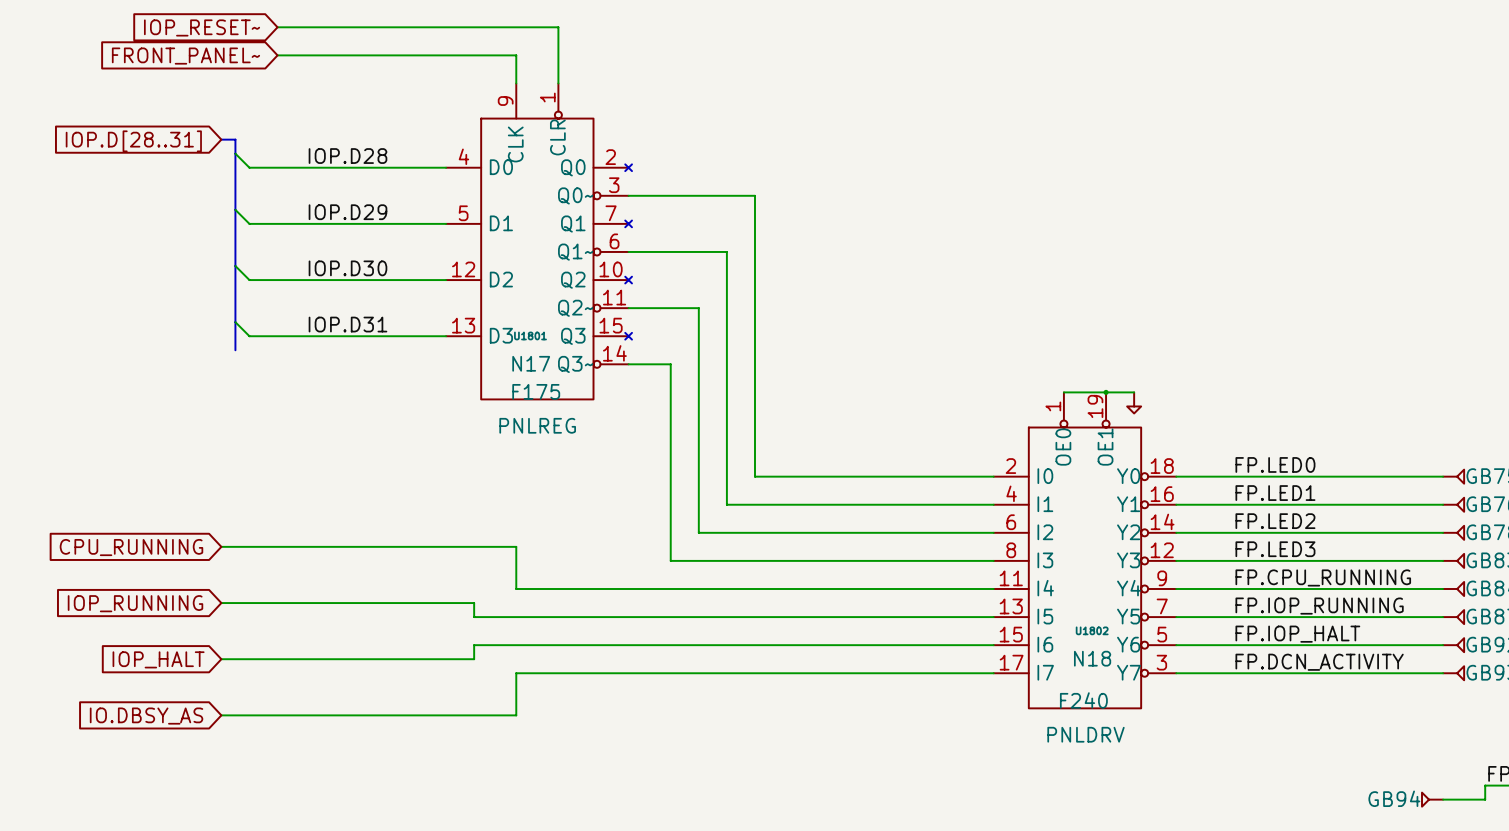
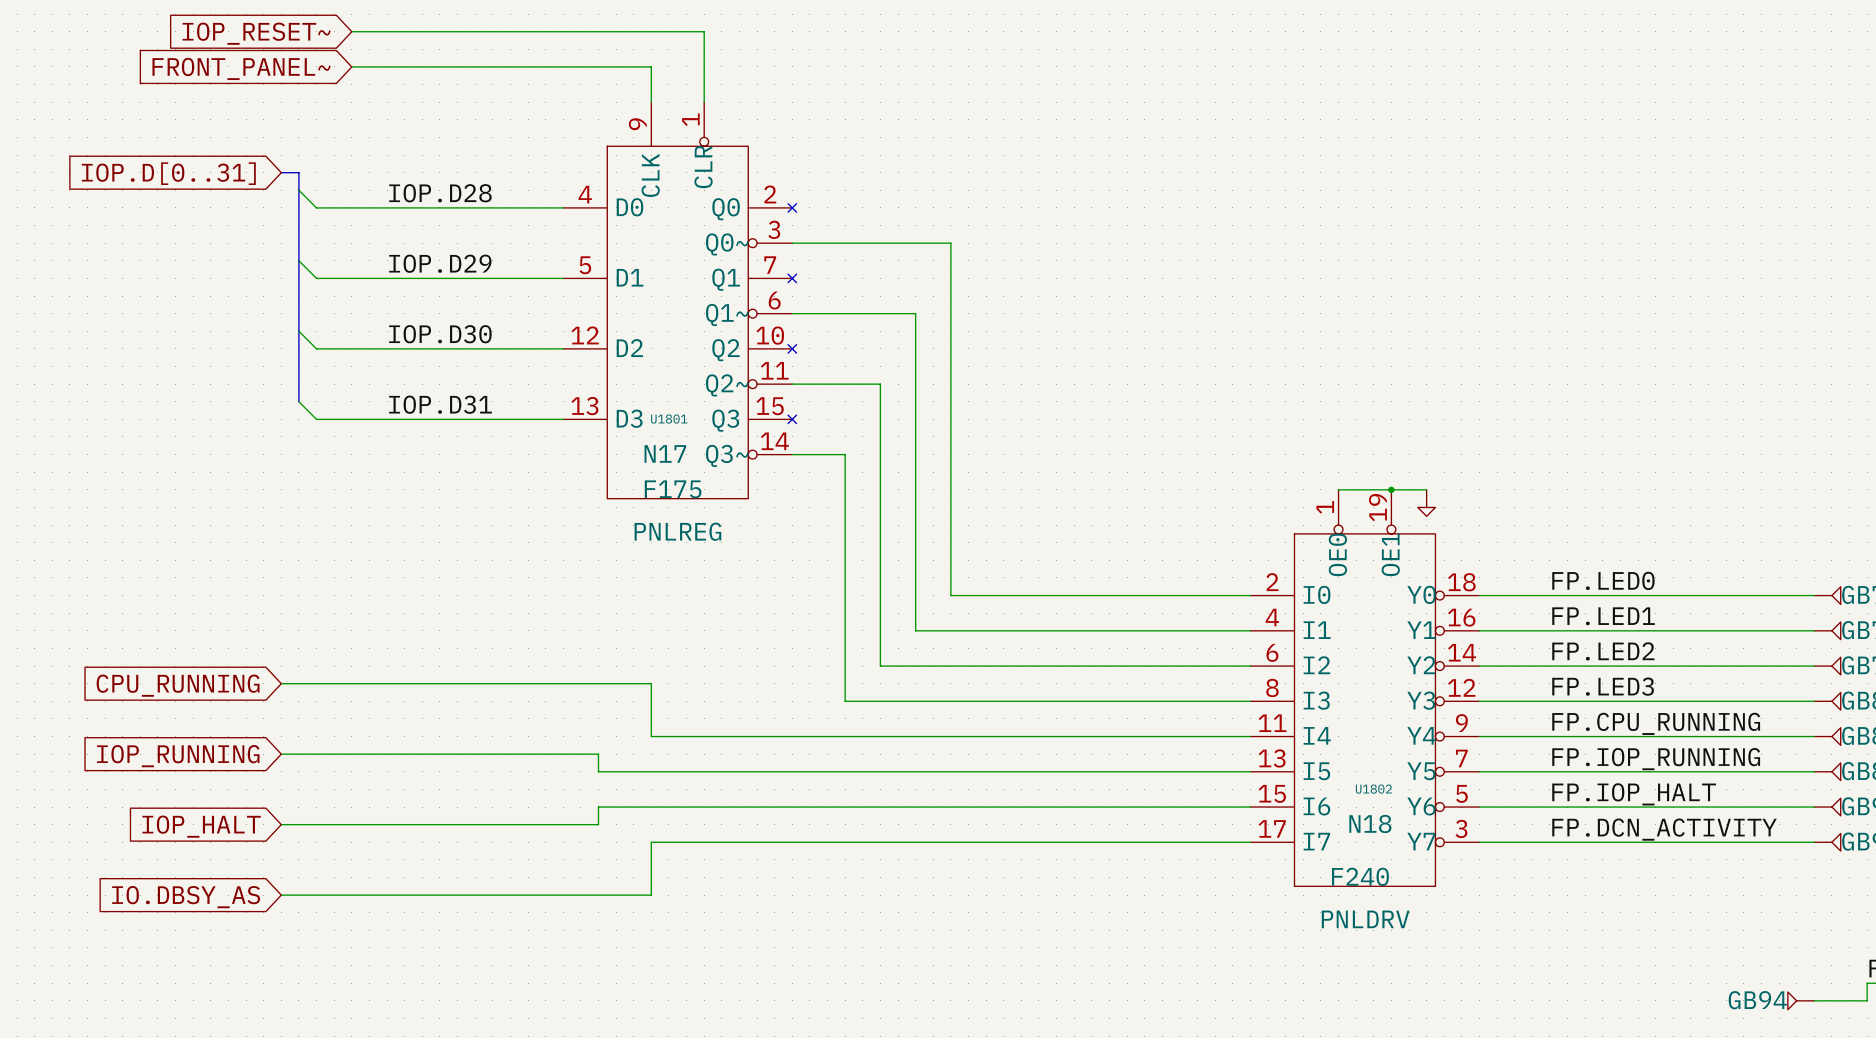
global label: IOP.D[28..31] (133, 141) -> IOP.D[0..31] (168, 173)
bus: (235, 322) (235, 350) -> none

